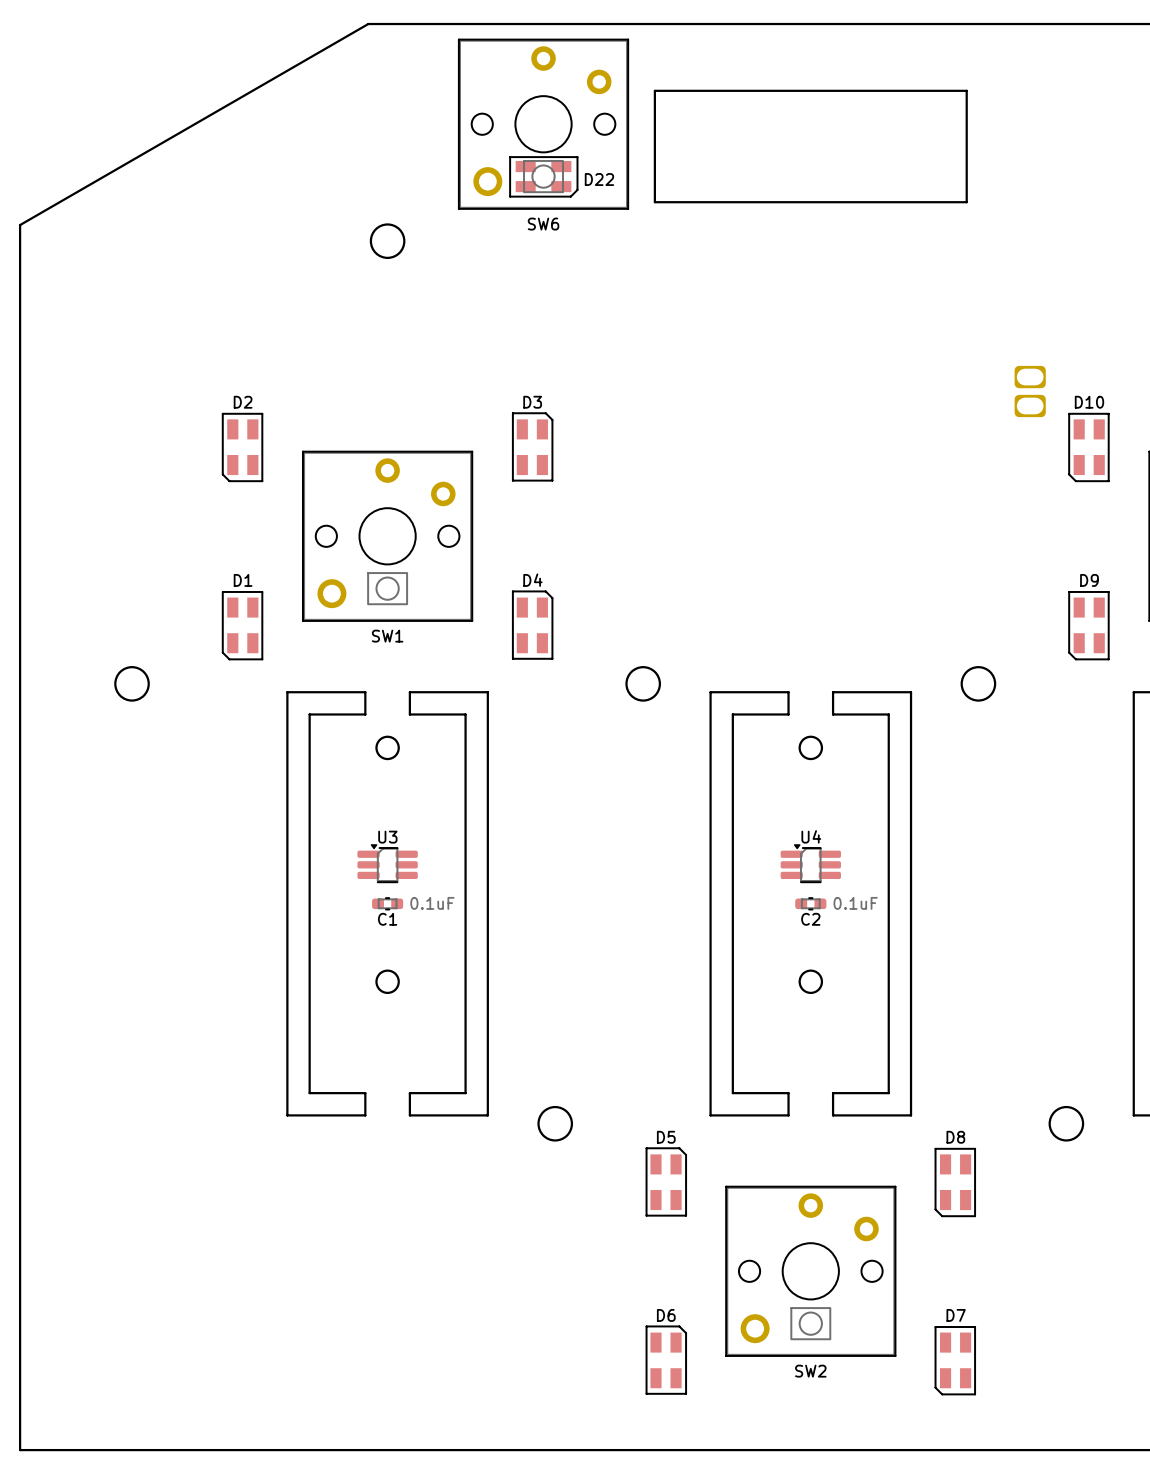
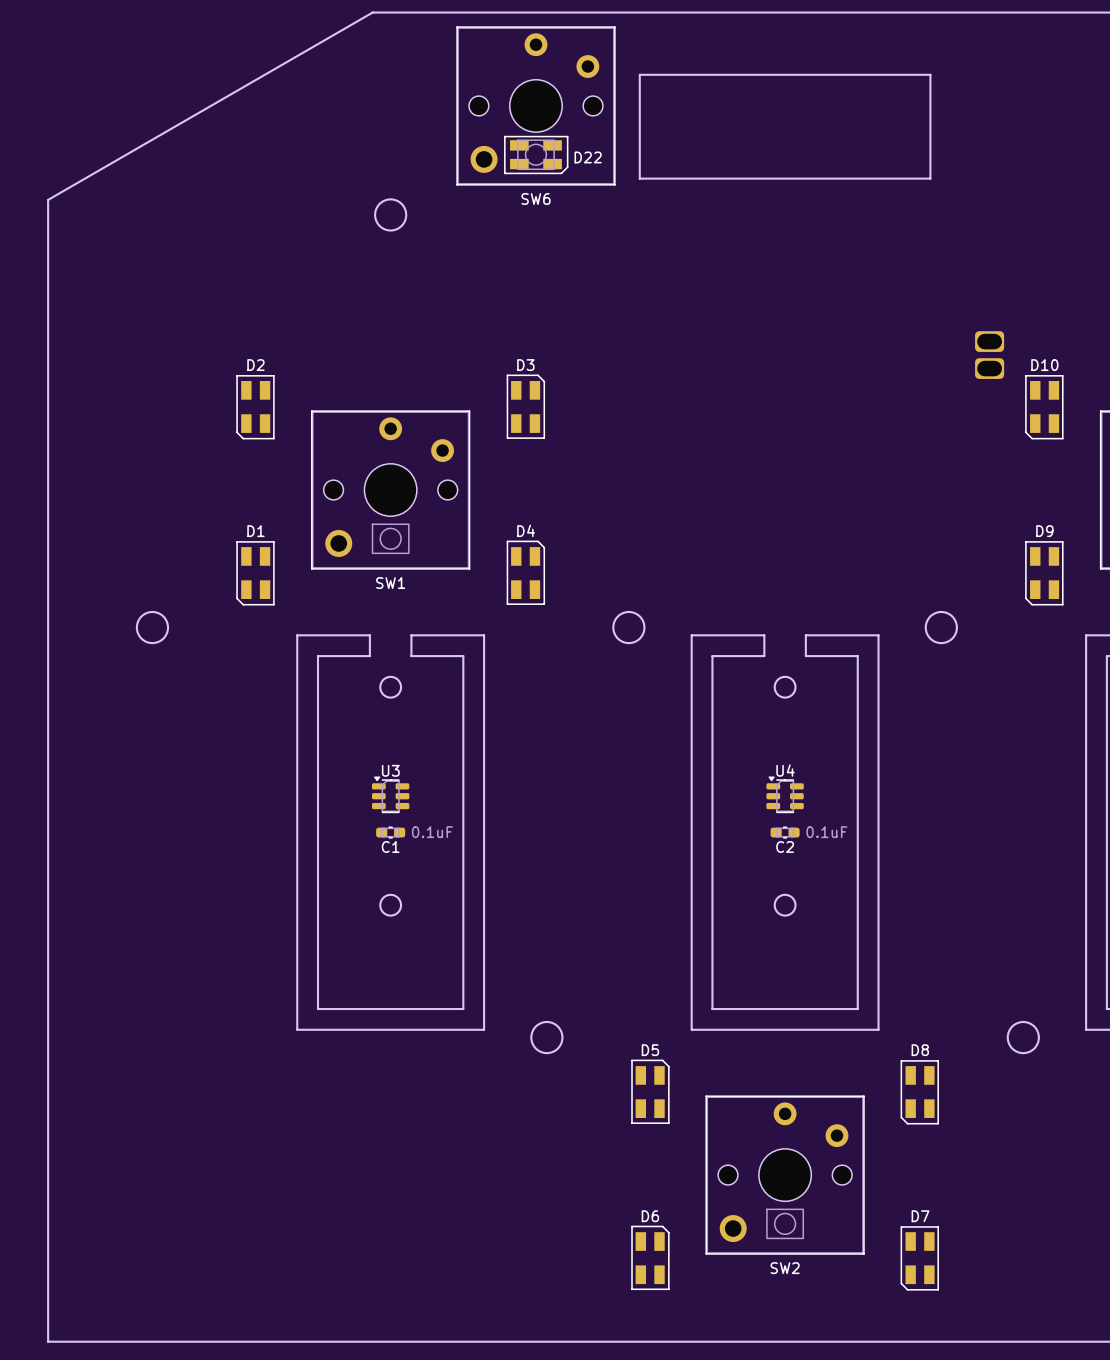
U3 footprint: [357, 844, 418, 883] -> [371, 776, 410, 814]
U4 footprint: [780, 844, 841, 883] -> [766, 776, 804, 814]
board edge: (365, 1093) (365, 1115) -> (369, 1009) (411, 1009)
board edge: (409, 1093) (409, 1115) -> (369, 1029) (411, 1029)
board edge: (788, 1093) (788, 1115) -> (764, 1009) (805, 1009)
board edge: (833, 1093) (833, 1115) -> (764, 1029) (805, 1029)

